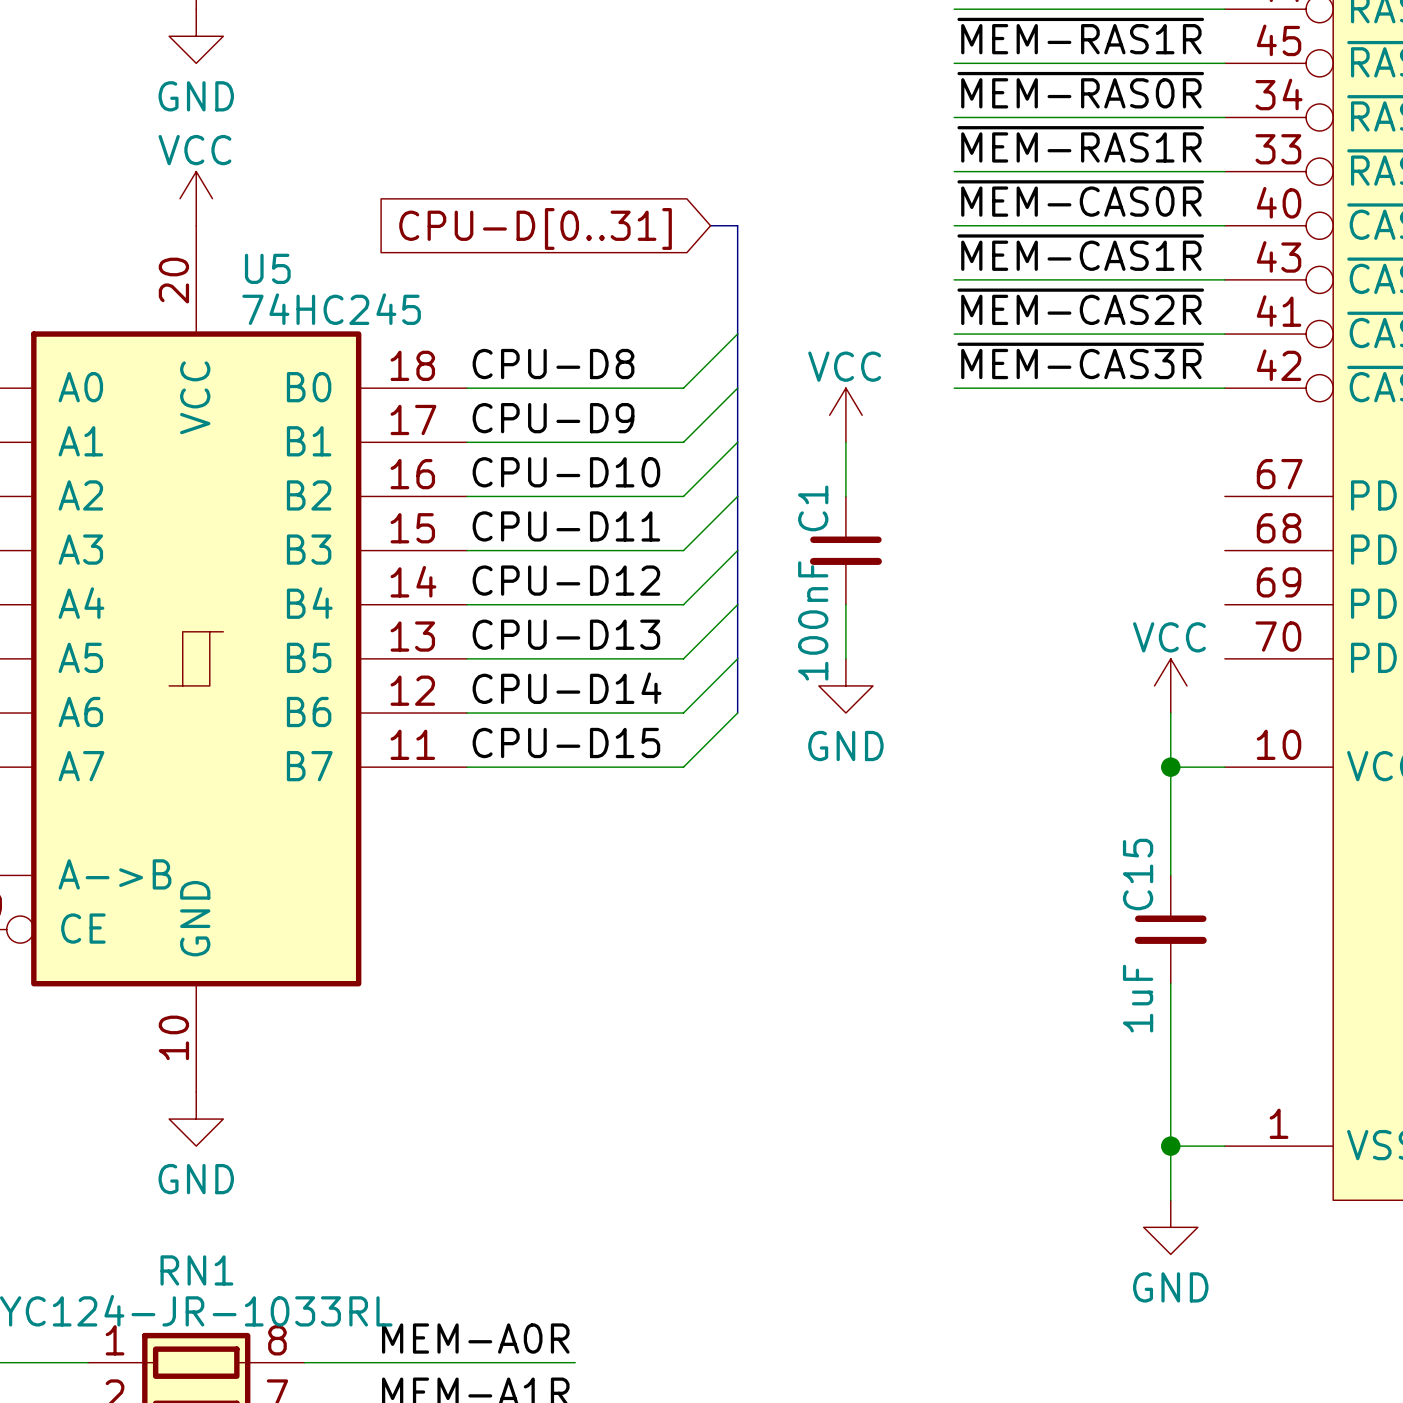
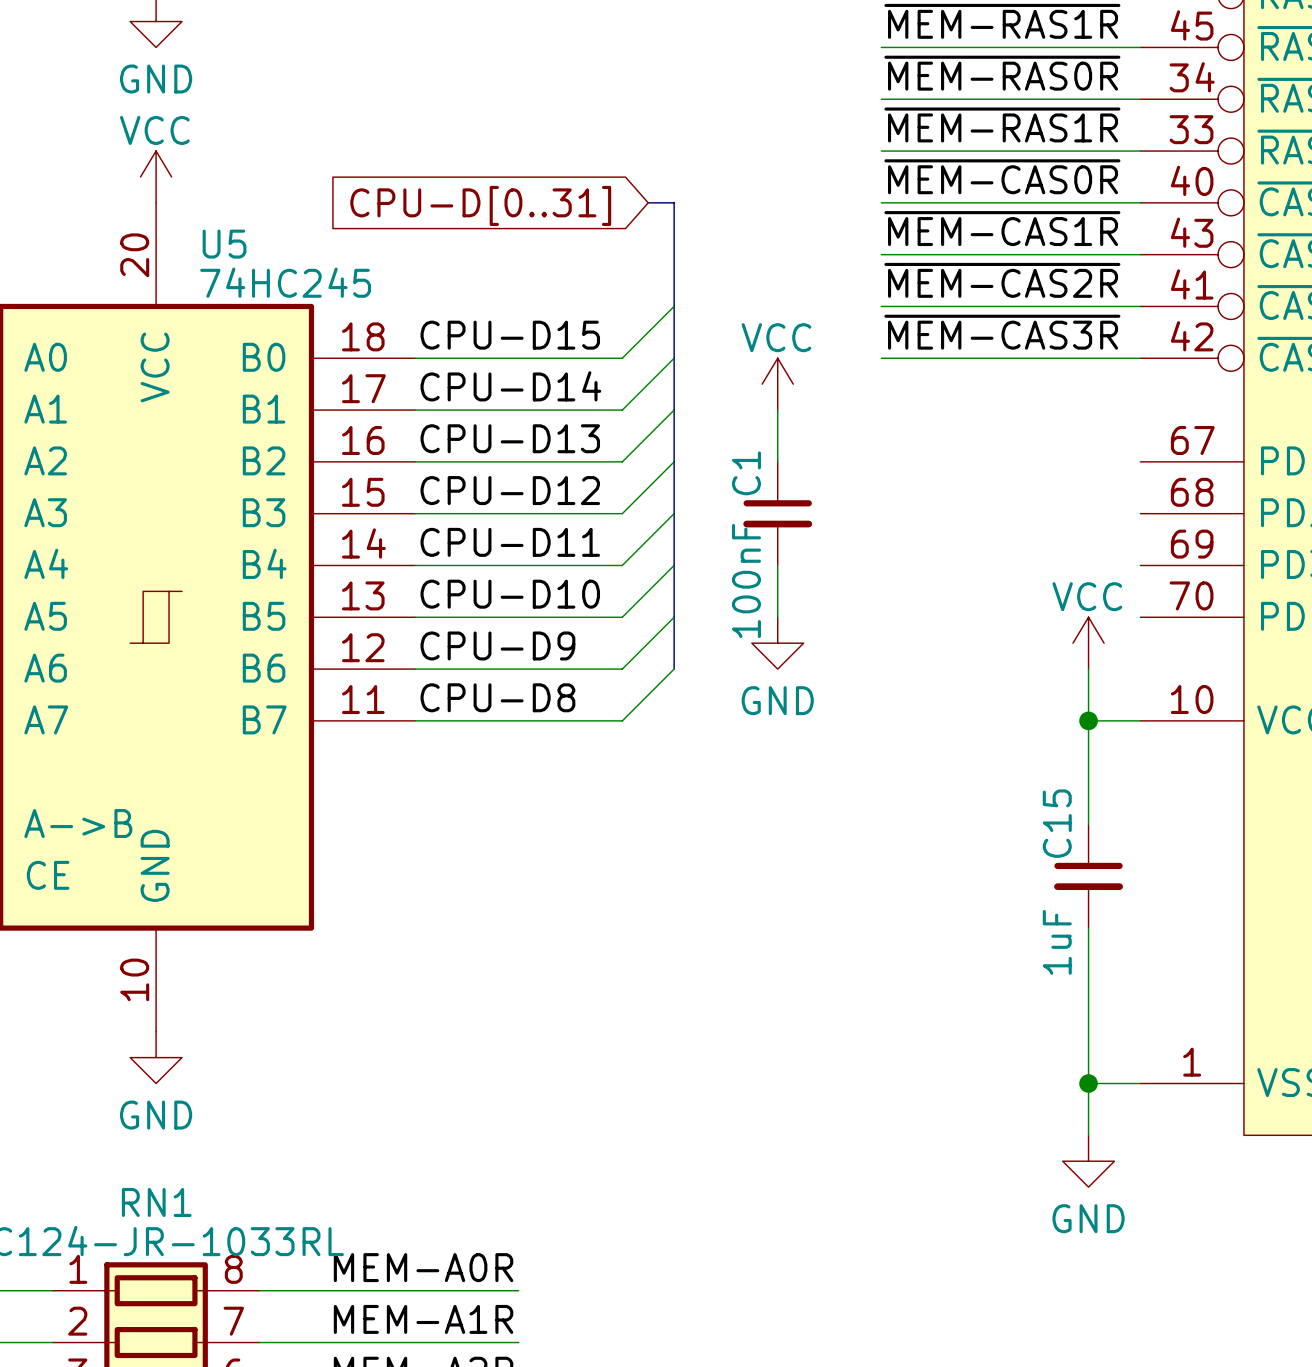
label: CPU-D8 (553, 364) -> CPU-D15 (510, 335)
label: CPU-D9 (553, 418) -> CPU-D14 (510, 386)
label: CPU-D10 (566, 472) -> CPU-D13 (510, 438)
label: CPU-D11 (566, 526) -> CPU-D12 (510, 490)
label: CPU-D12 (566, 580) -> CPU-D11 (510, 542)
label: CPU-D13 (566, 634) -> CPU-D10 (510, 594)
label: CPU-D14 (567, 688) -> CPU-D9 (497, 645)
label: CPU-D15 (566, 742) -> CPU-D8 (497, 697)

